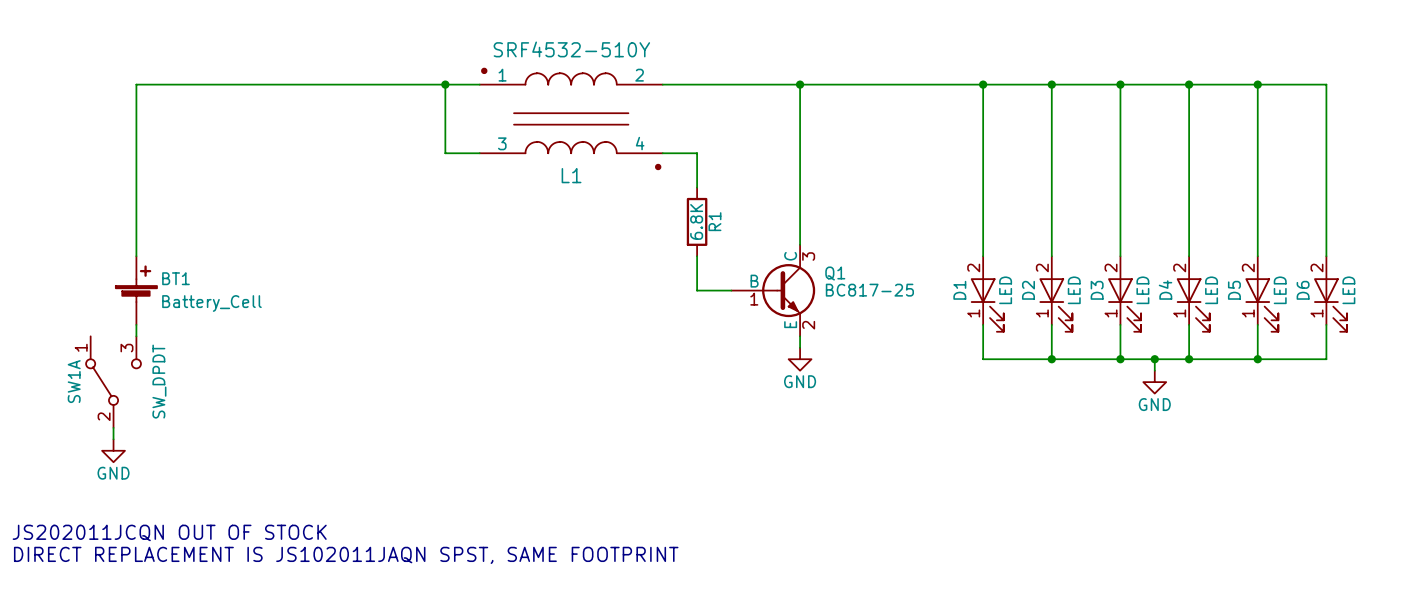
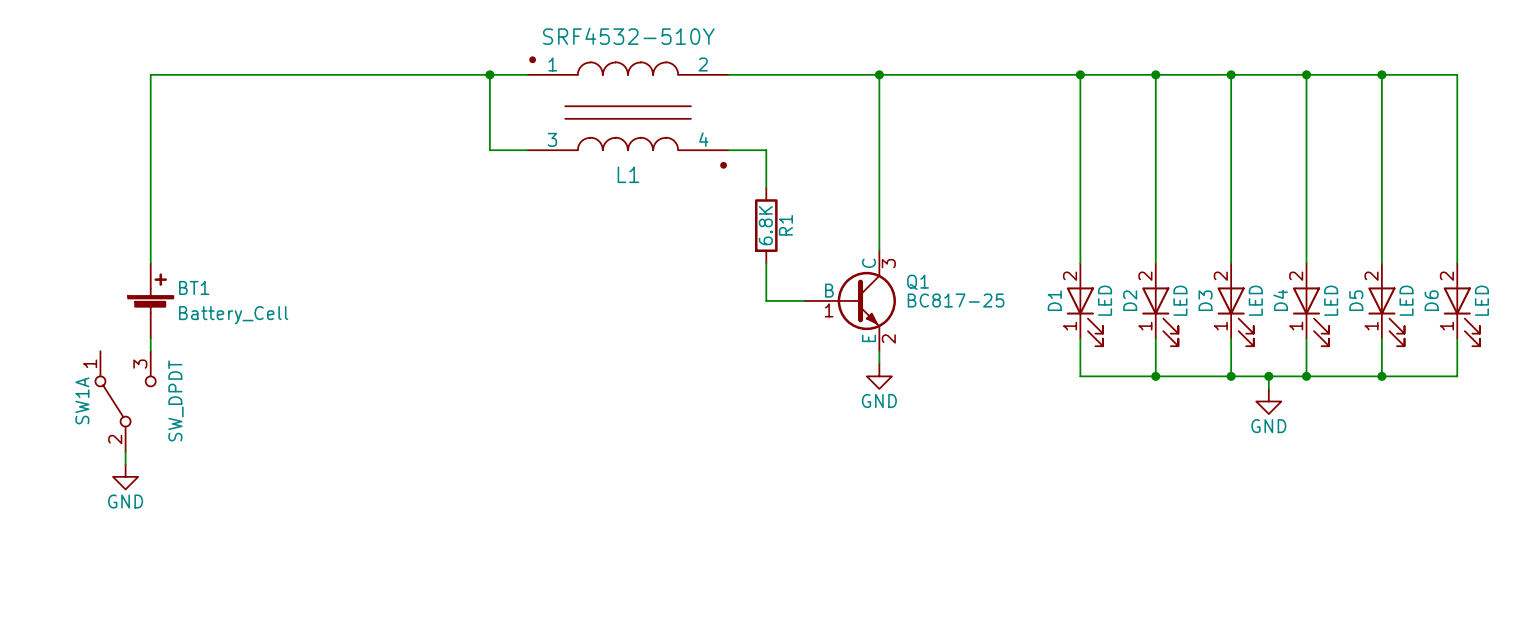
text: JS202011JCQN OUT OF STOCK (169, 532) -> none
text: DIRECT REPLACEMENT IS JS102011JAQN SPST, SAME FOOTPRINT (346, 555) -> none

